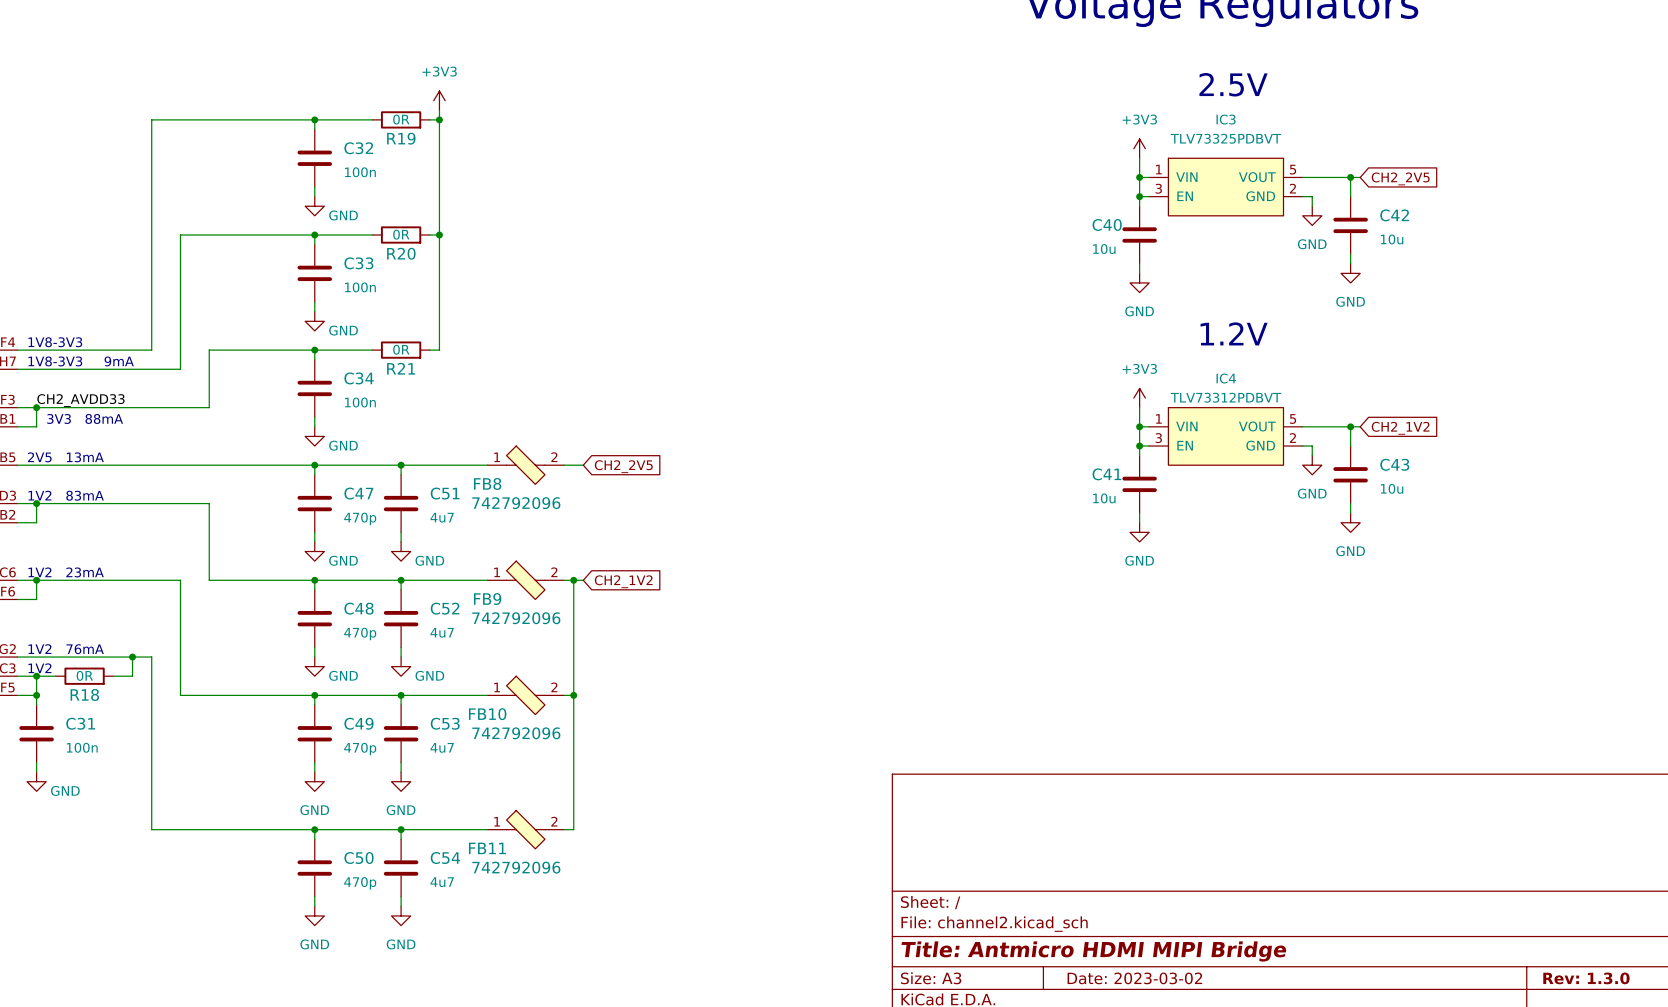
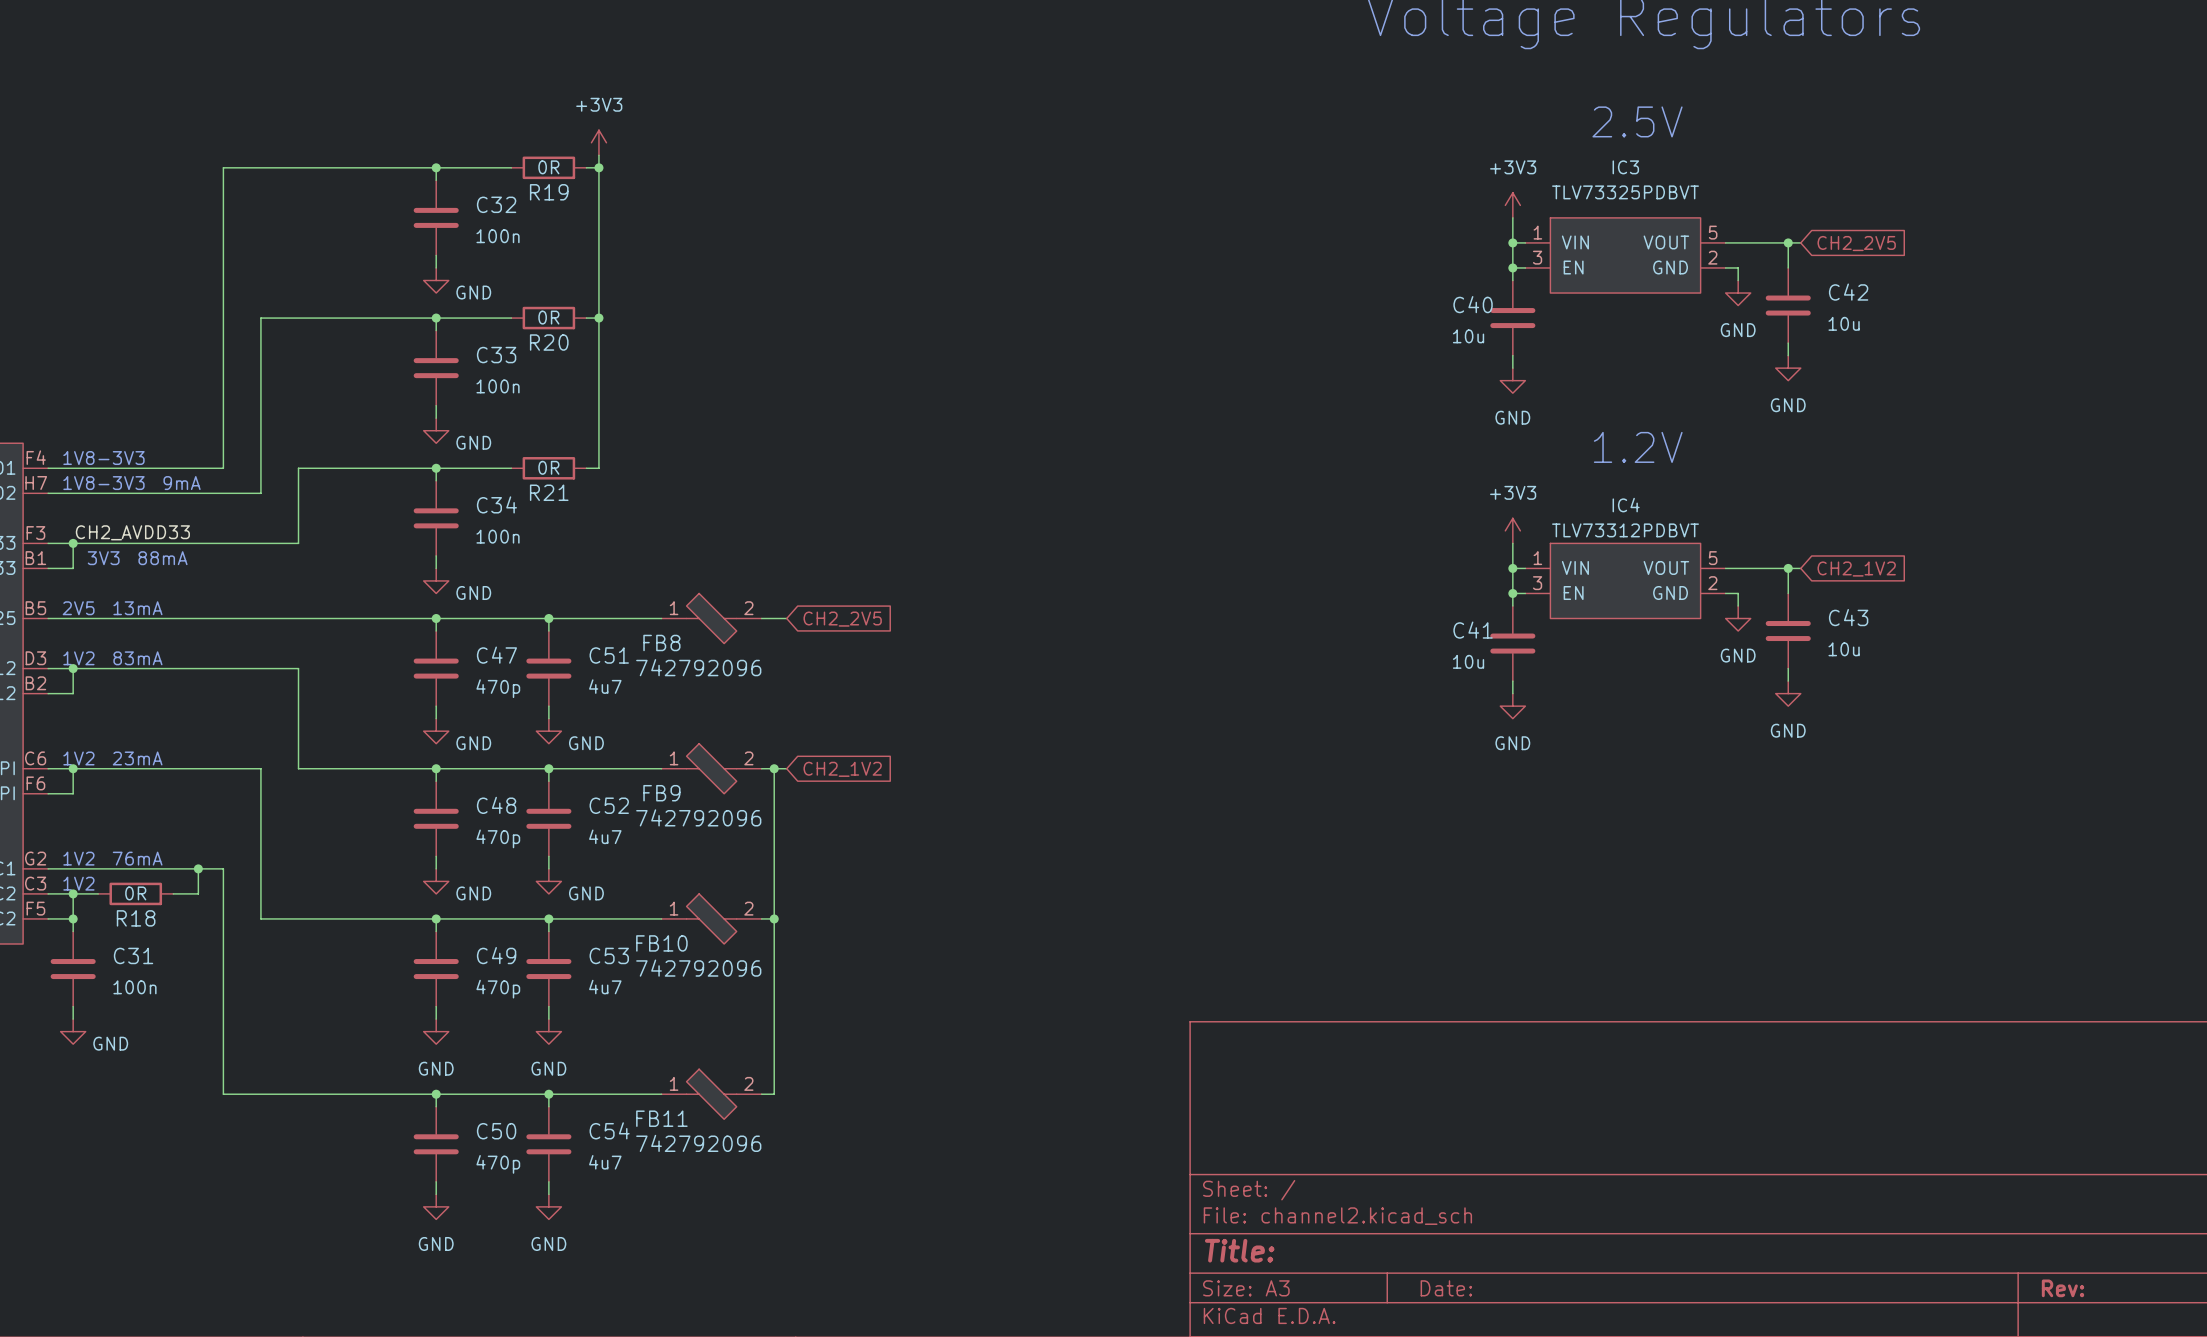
title block: Title: Antmicro HDMI MIPI Bridge (1093, 951) -> Title: (1239, 1250)
title block: Date: 2023-03-02 (1134, 978) -> Date: (1446, 1288)
title block: Rev: 1.3.0 (1586, 978) -> Rev: (2063, 1288)

